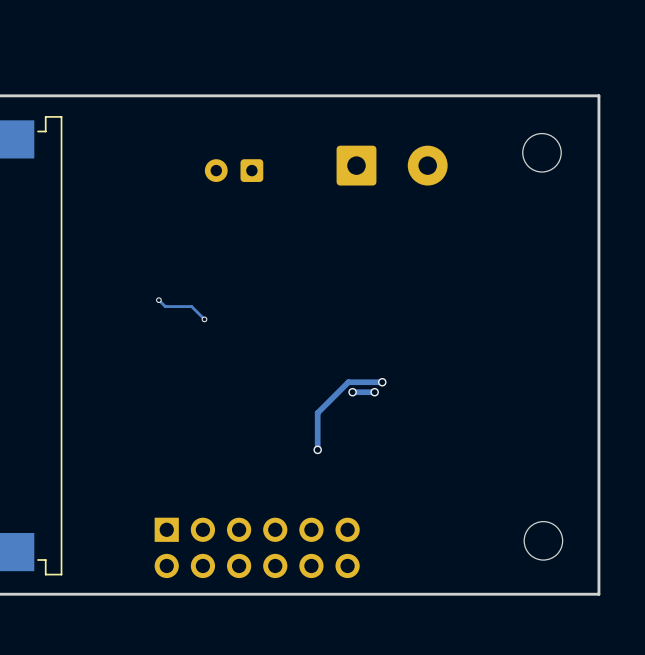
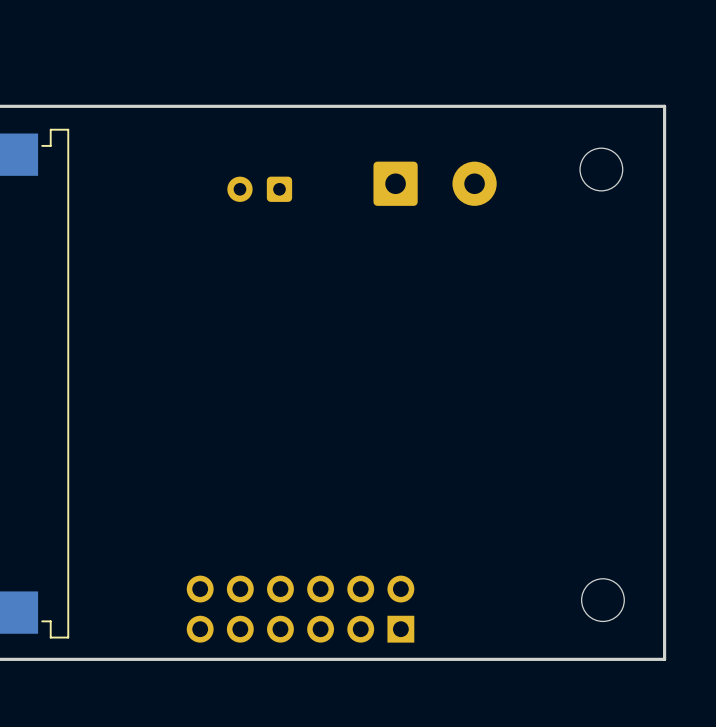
track: (158, 300) (165, 306) (191, 306) (204, 319) -> none
via: (158, 300) -> none
via: (204, 319) -> none
track: (382, 382) (348, 382) (317, 412) (317, 449) -> none
via: (382, 382) -> none
via: (352, 392) -> none
track: (374, 392) (352, 392) -> none
via: (374, 392) -> none
via: (317, 449) -> none
part rotation: 0° (257, 547) -> 180° (300, 609)

